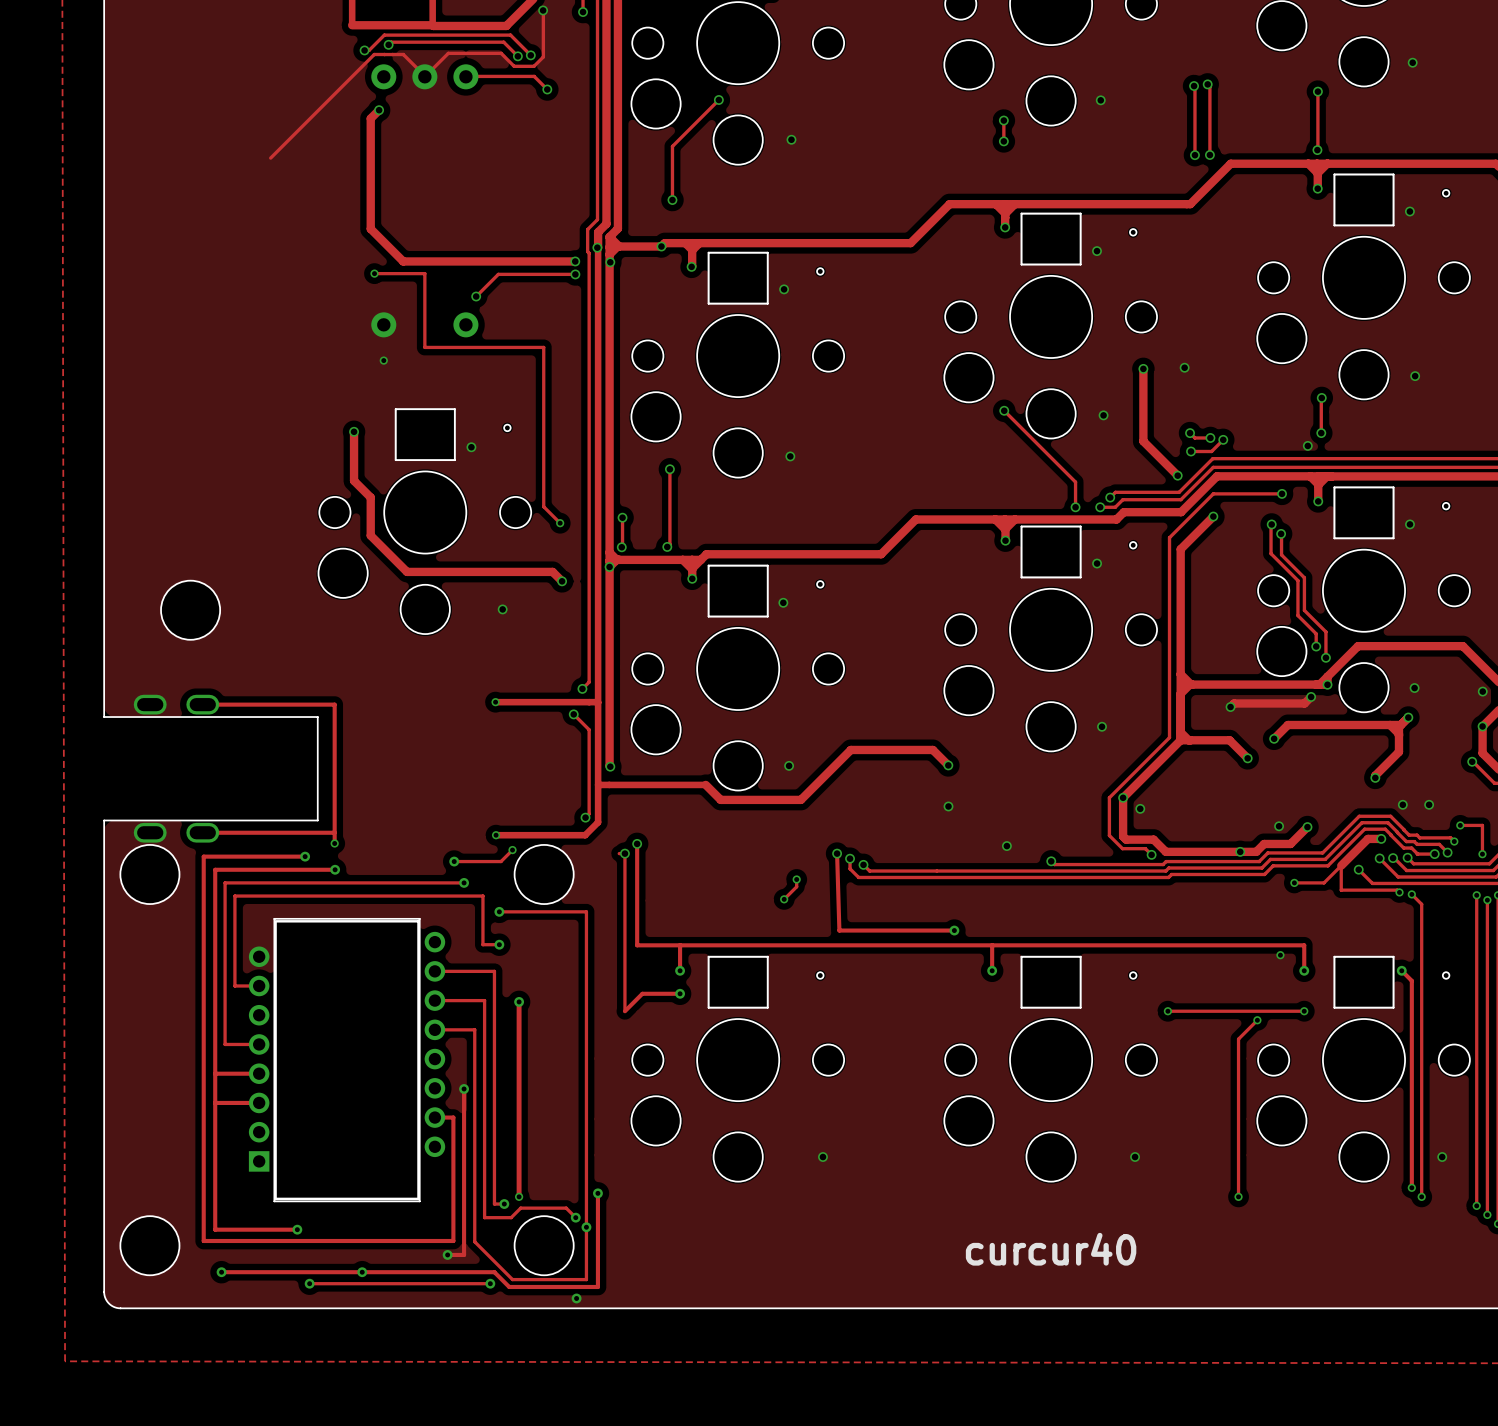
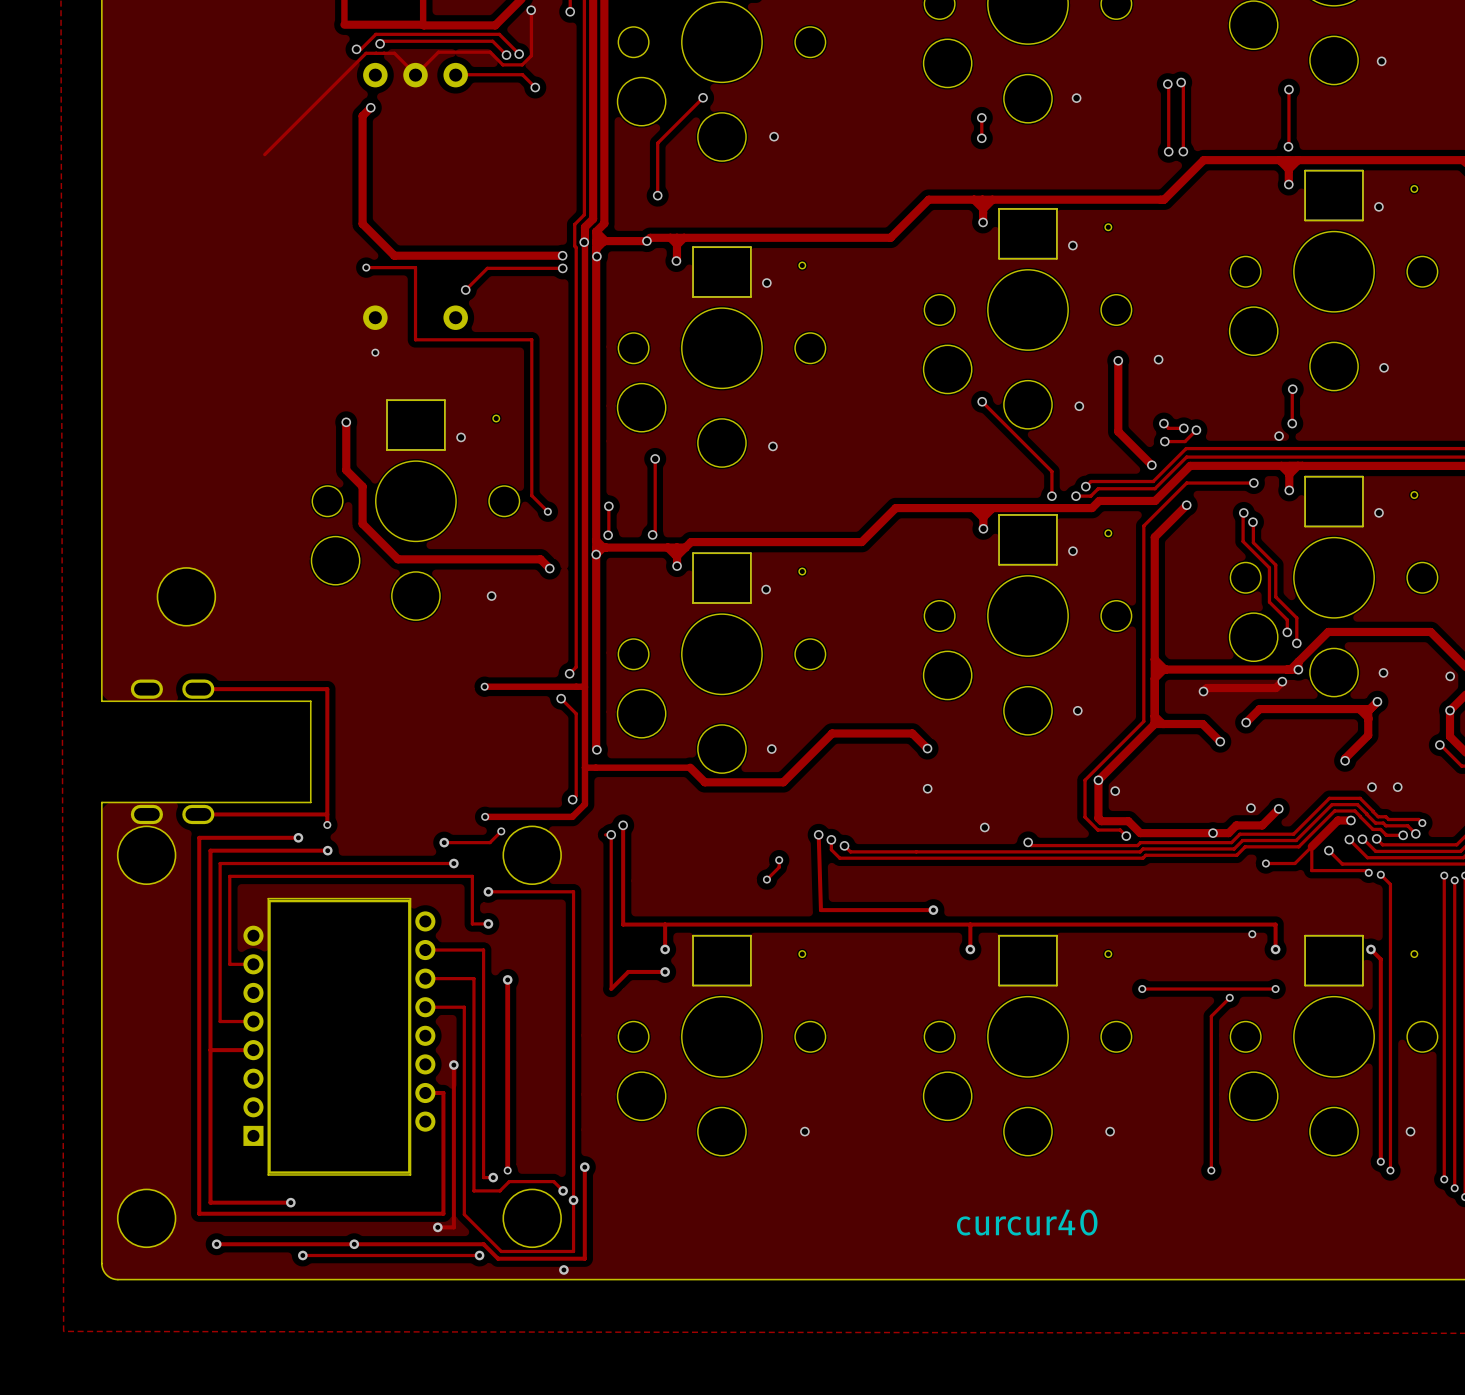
track: (1460, 825) (1482, 825) (1482, 854) -> none
via: (1460, 825) -> none
via: (1482, 854) -> none
track: (215, 1102) (259, 1102) -> none

